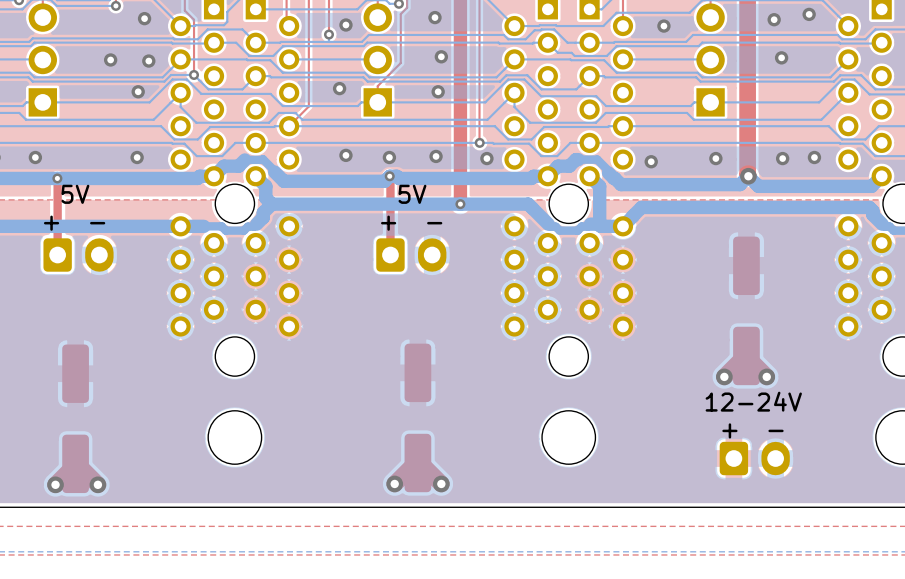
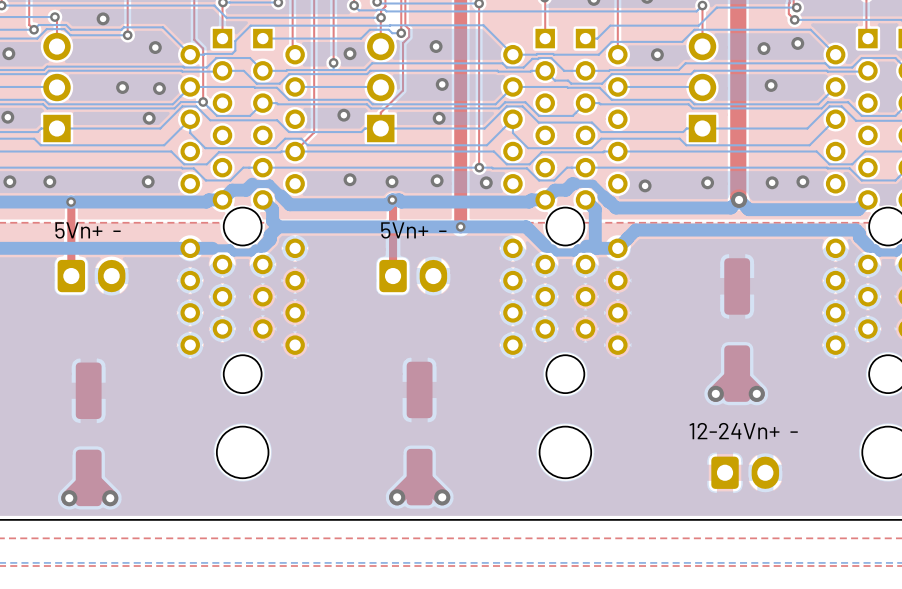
text: 5V (75, 194) -> none
text: 5V (412, 194) -> none
text: + - (74, 223) -> 5Vn+ - (88, 230)
text: + - (411, 223) -> 5Vn+ - (413, 230)
text: 12-24V (753, 401) -> 12-24Vn+ - (743, 431)
text: + - (752, 430) -> none

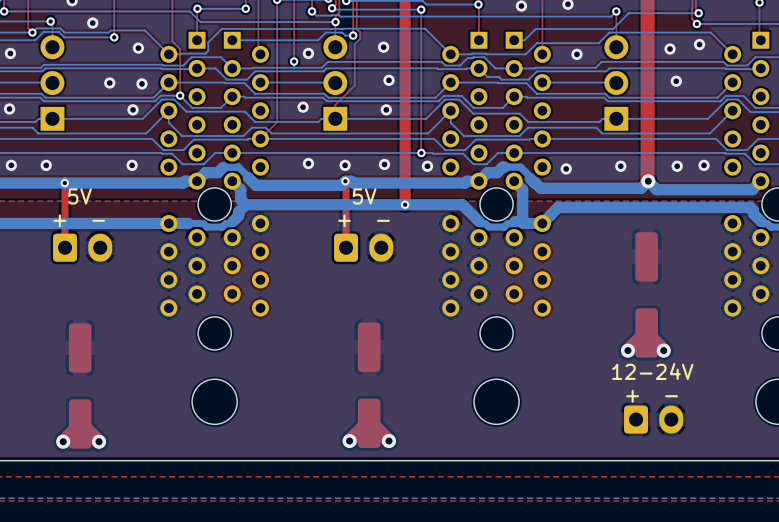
text: none -> 5V (79, 196)
text: none -> 5V (364, 196)
text: 5Vn+ - (88, 230) -> + - (79, 220)
text: 5Vn+ - (413, 230) -> + - (363, 220)
text: 12-24Vn+ - (743, 431) -> 12-24V (652, 371)
text: none -> + - (652, 396)

